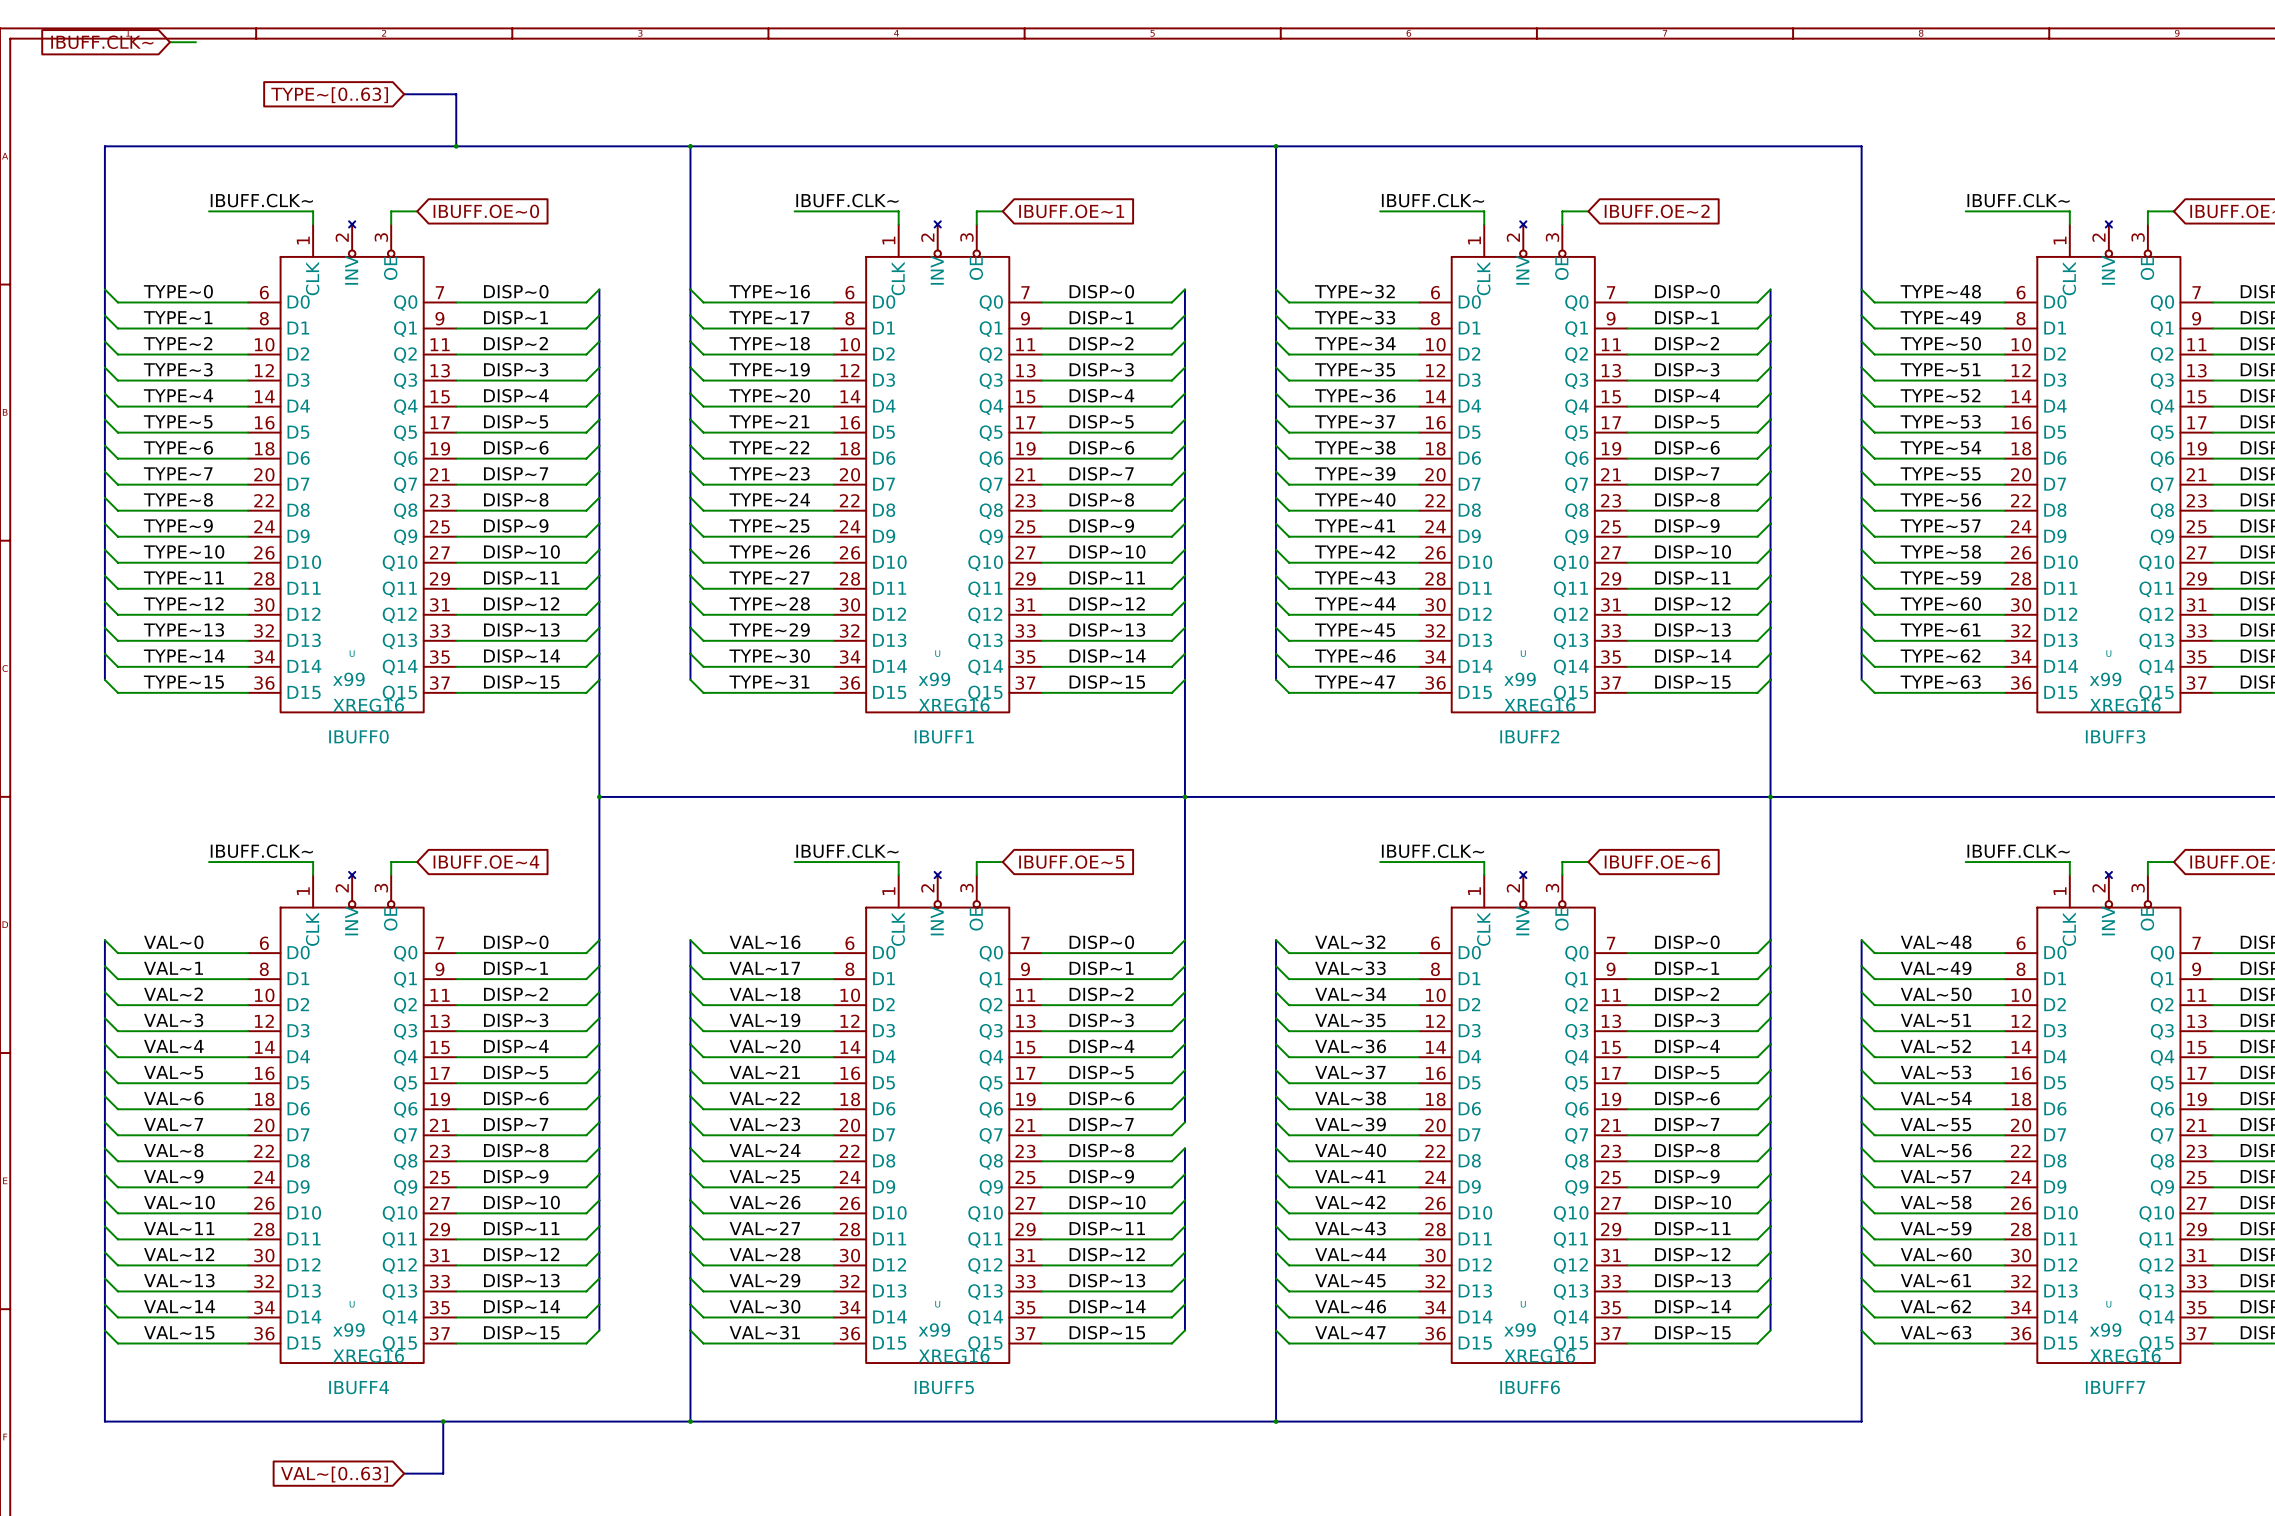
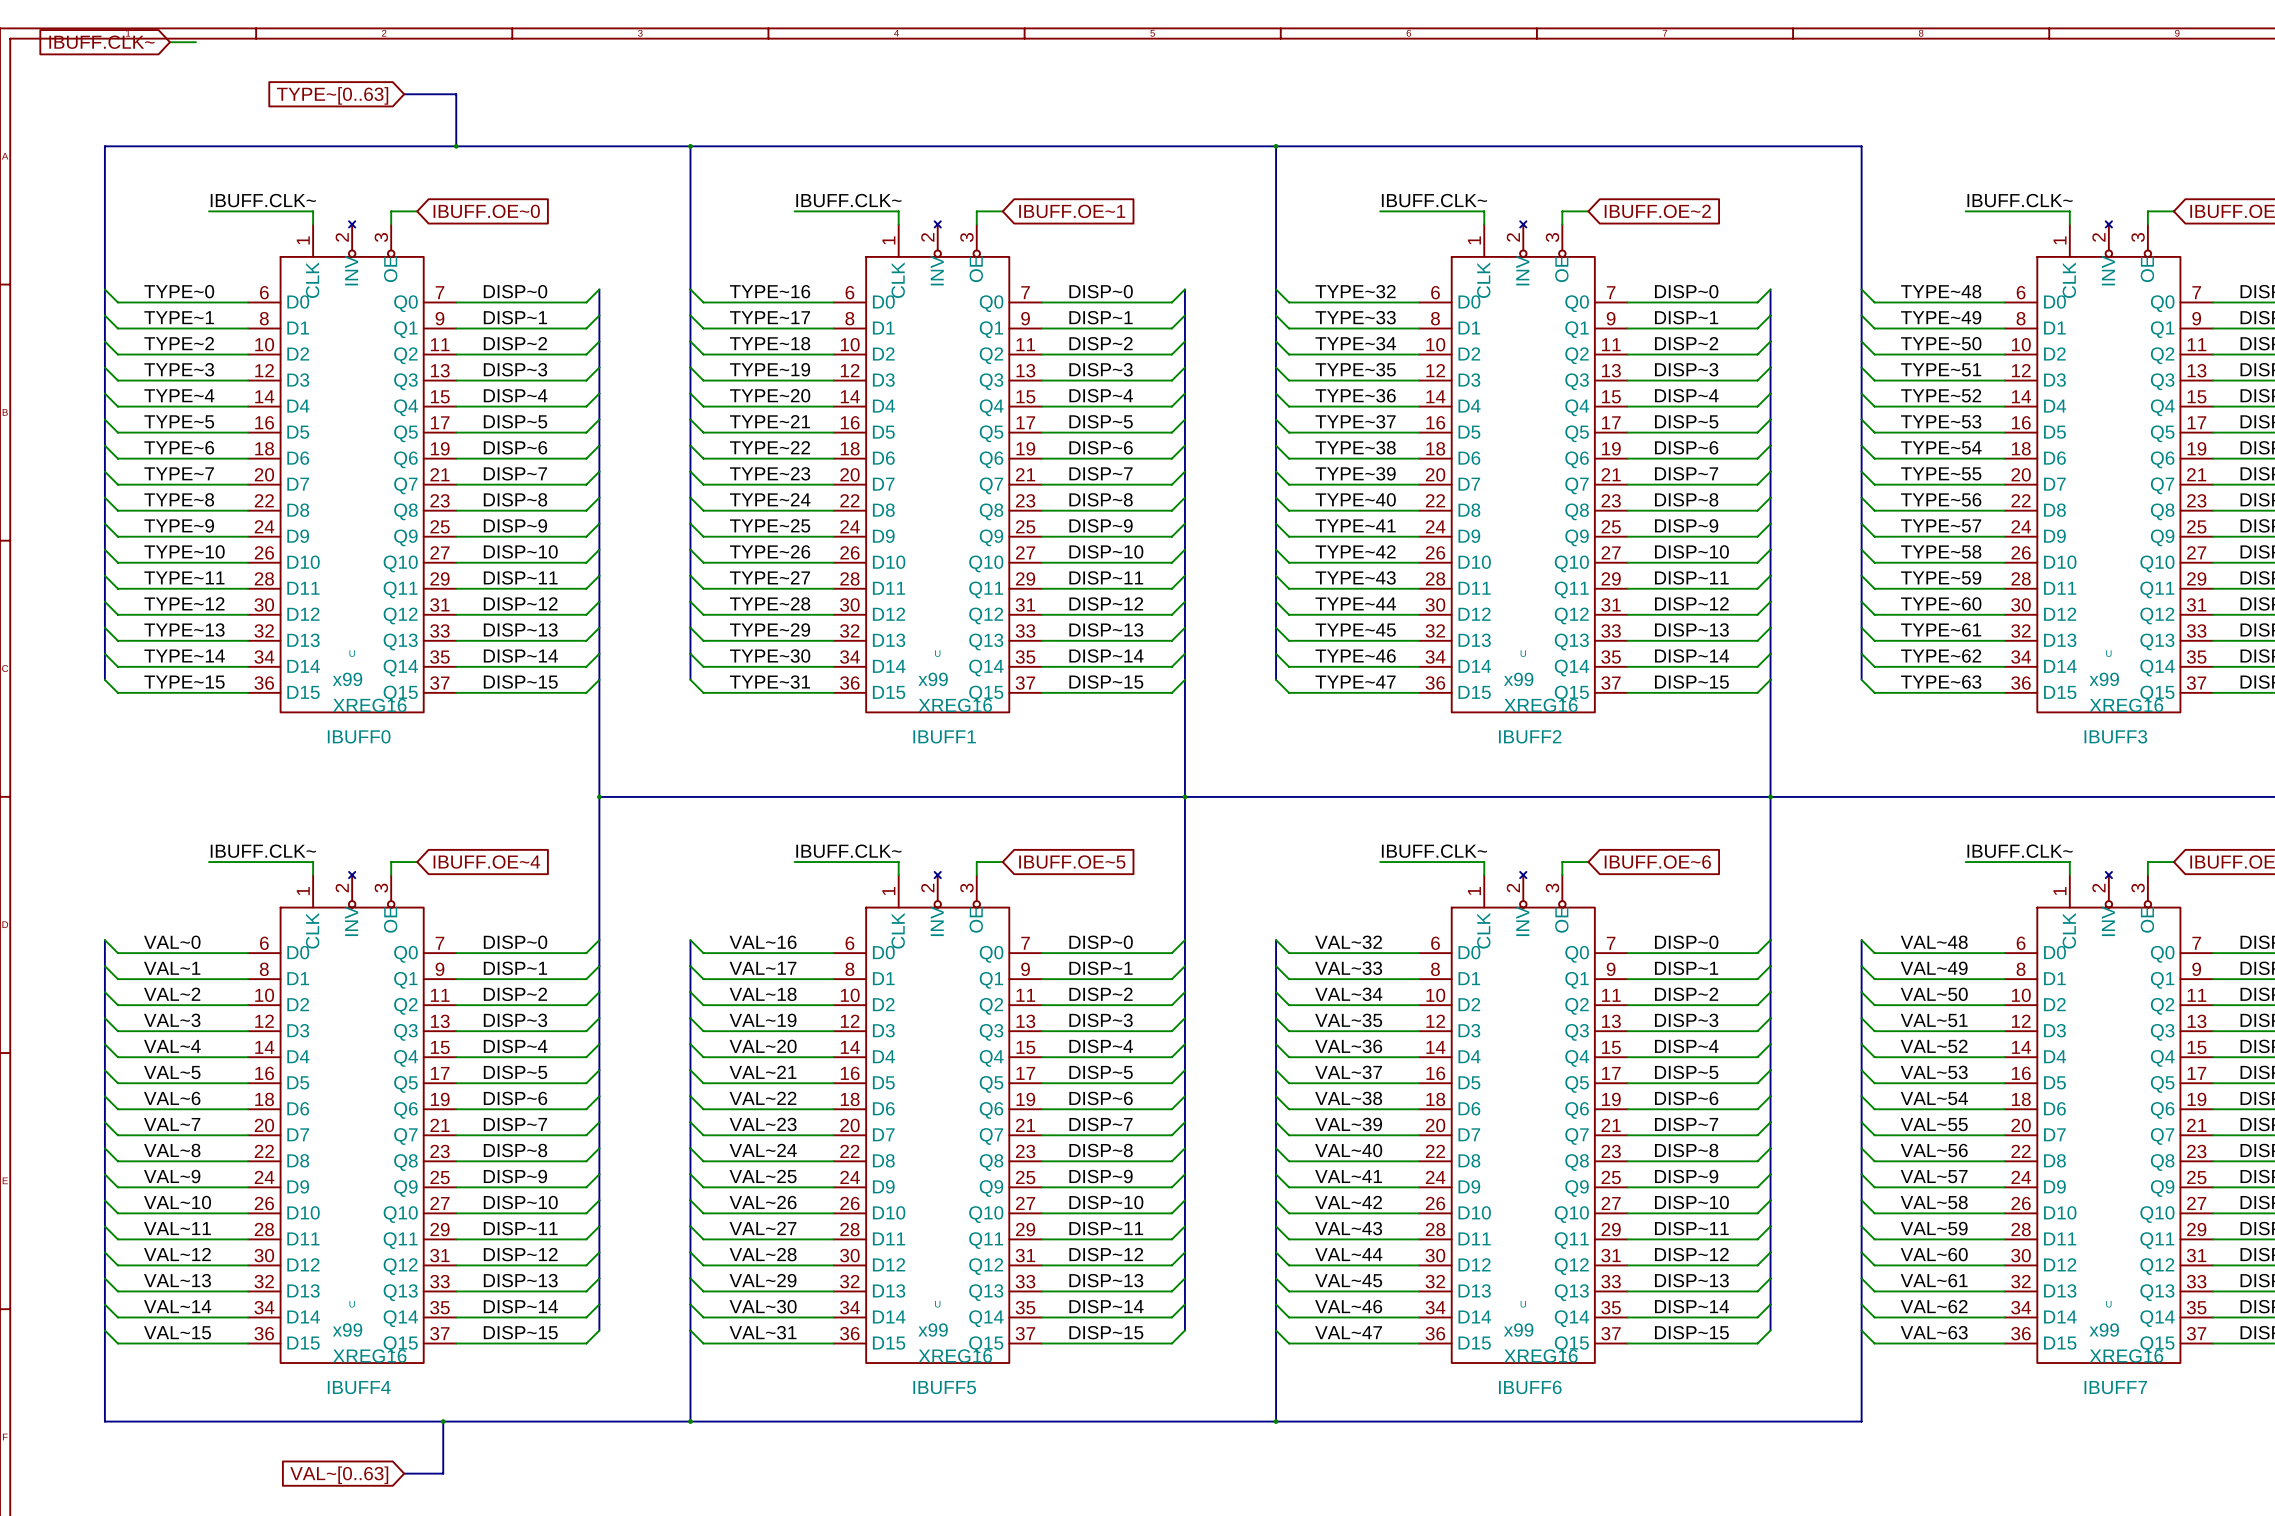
bus: none -> (1184, 1122) (1184, 1148)

